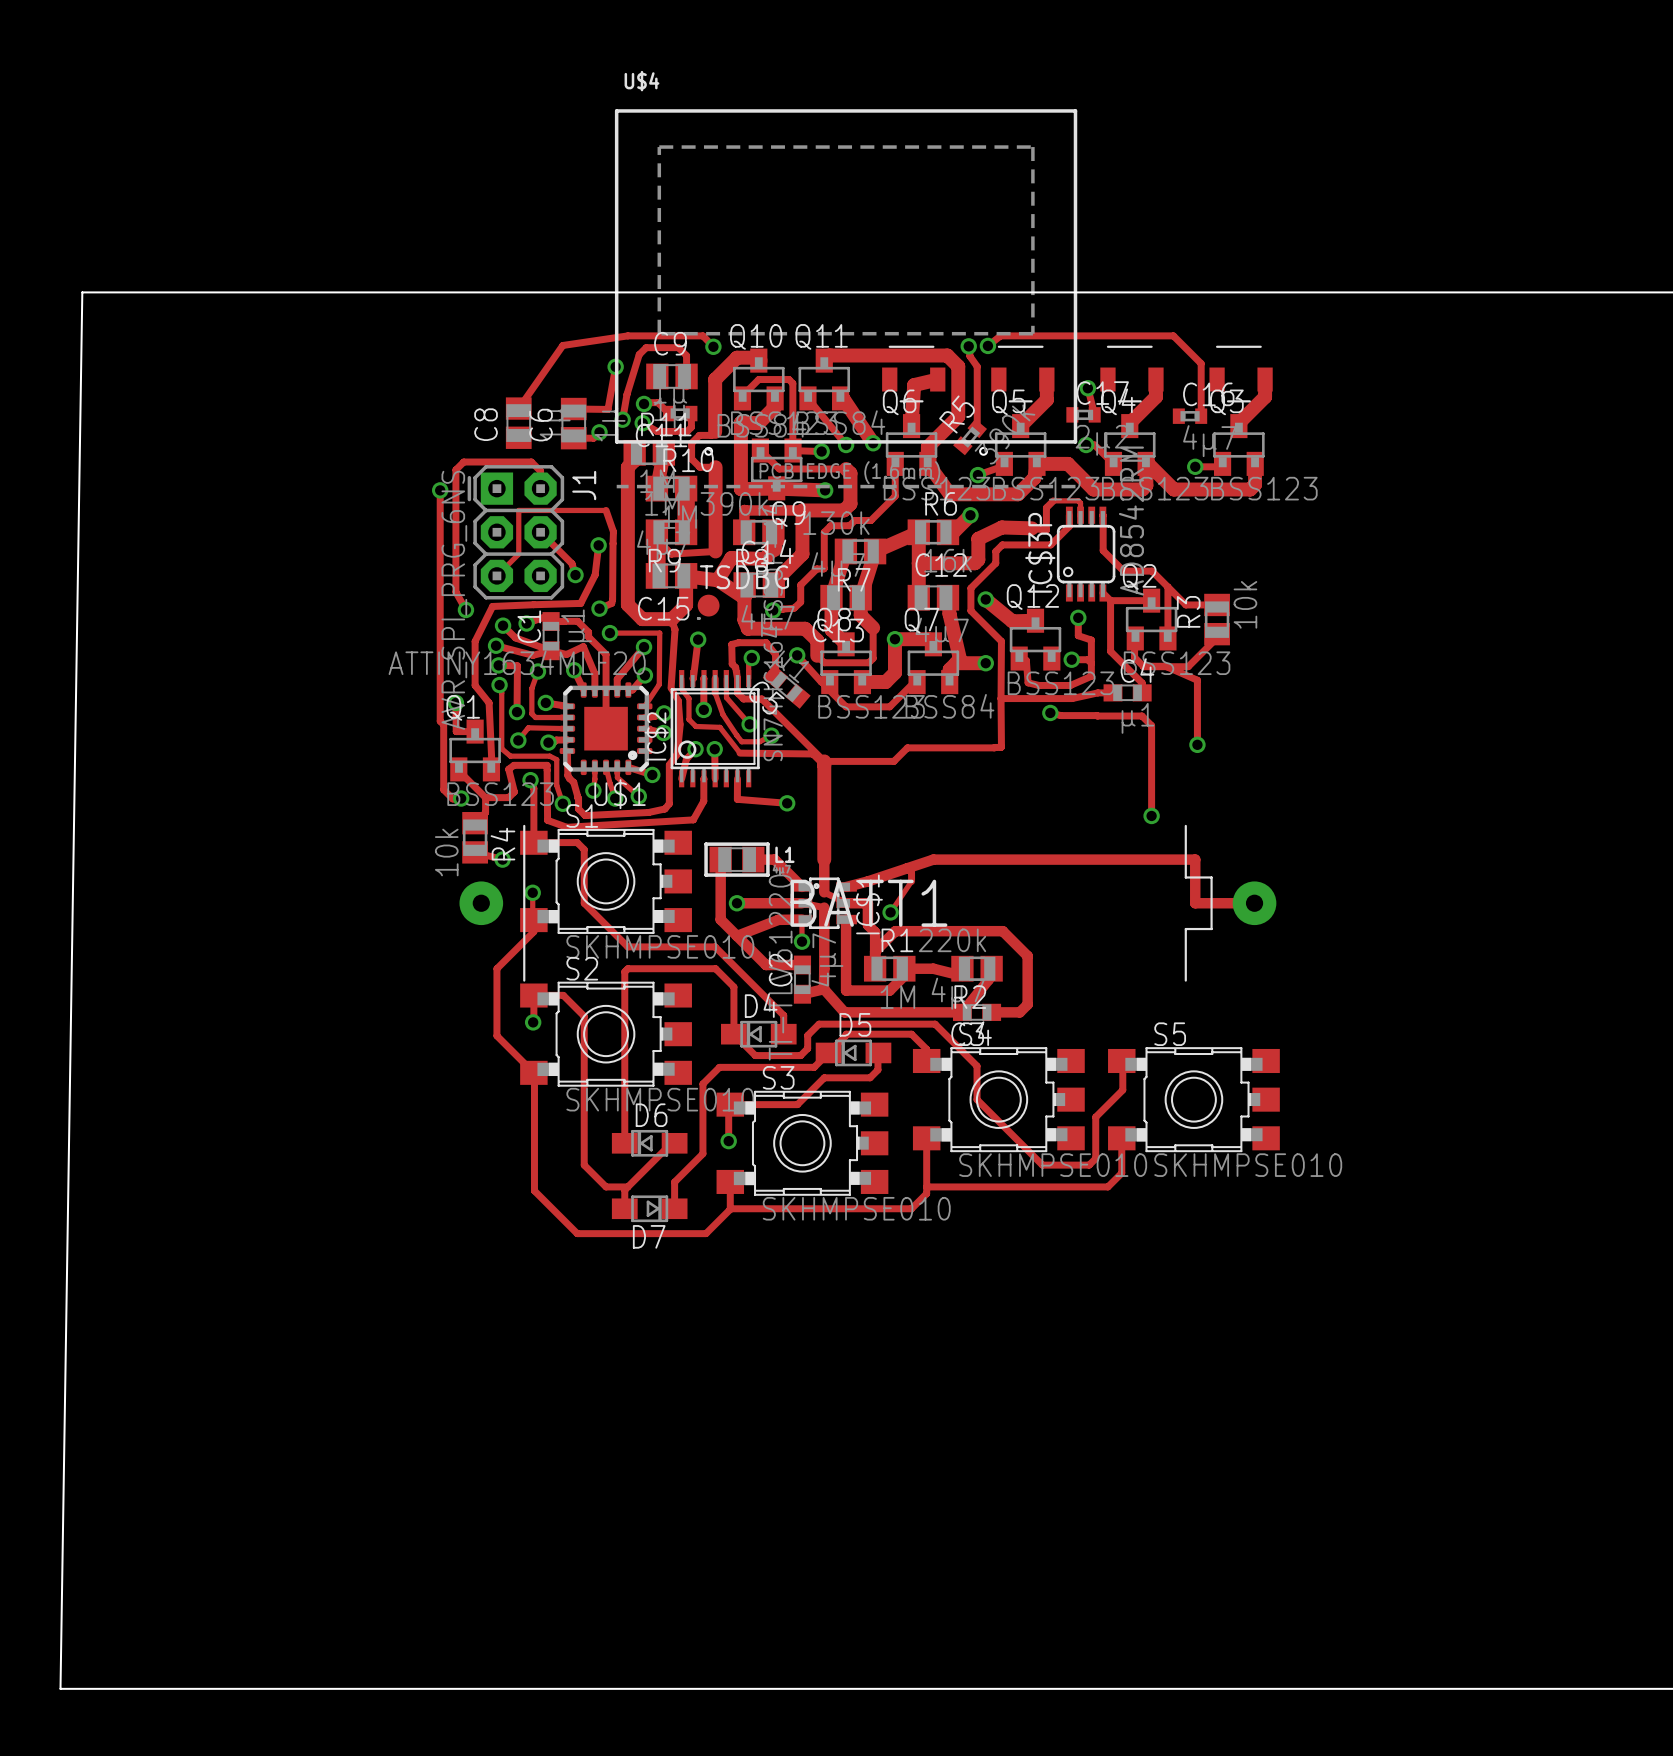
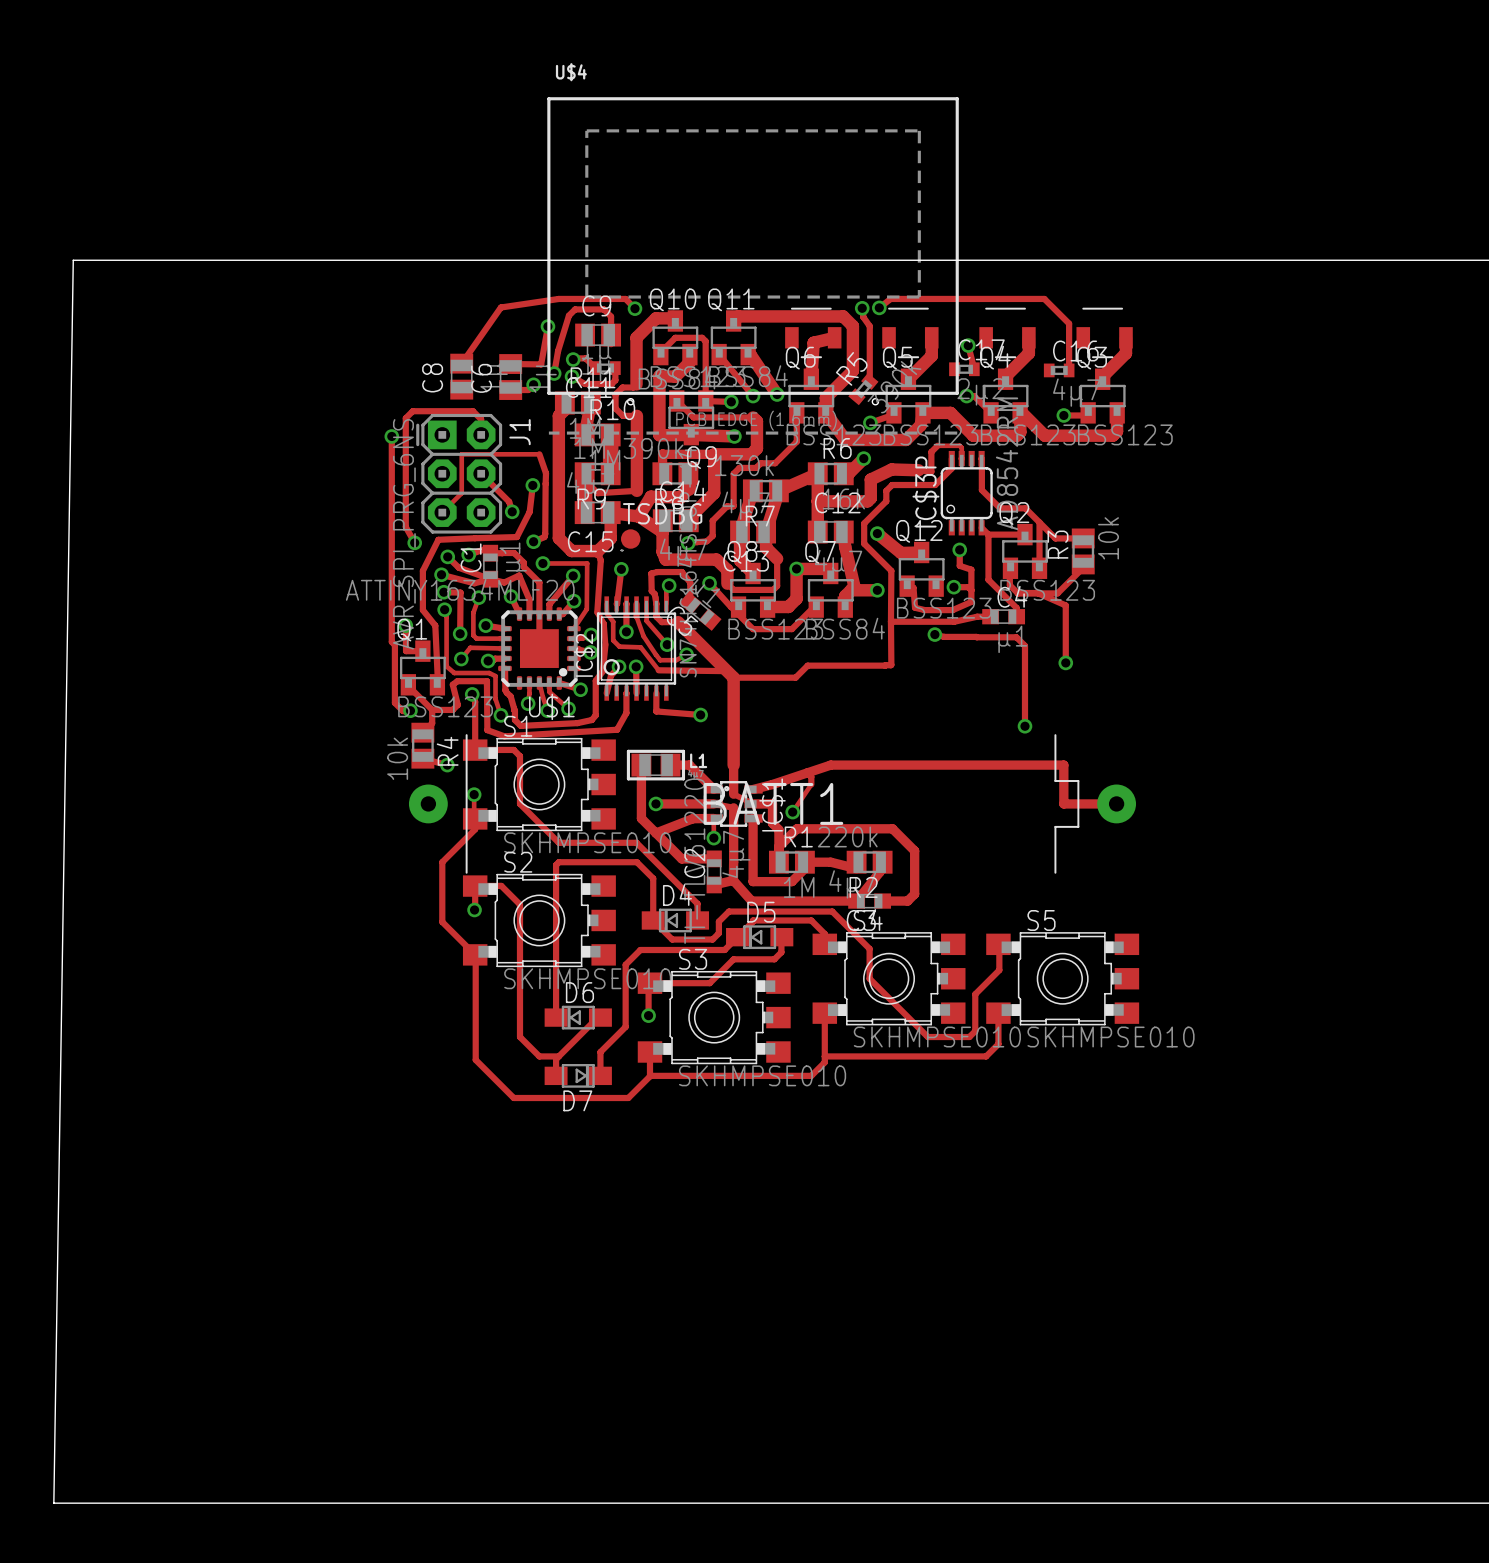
track width: thin (761, 699) (824, 761) -> thick (678, 622) (733, 677)

